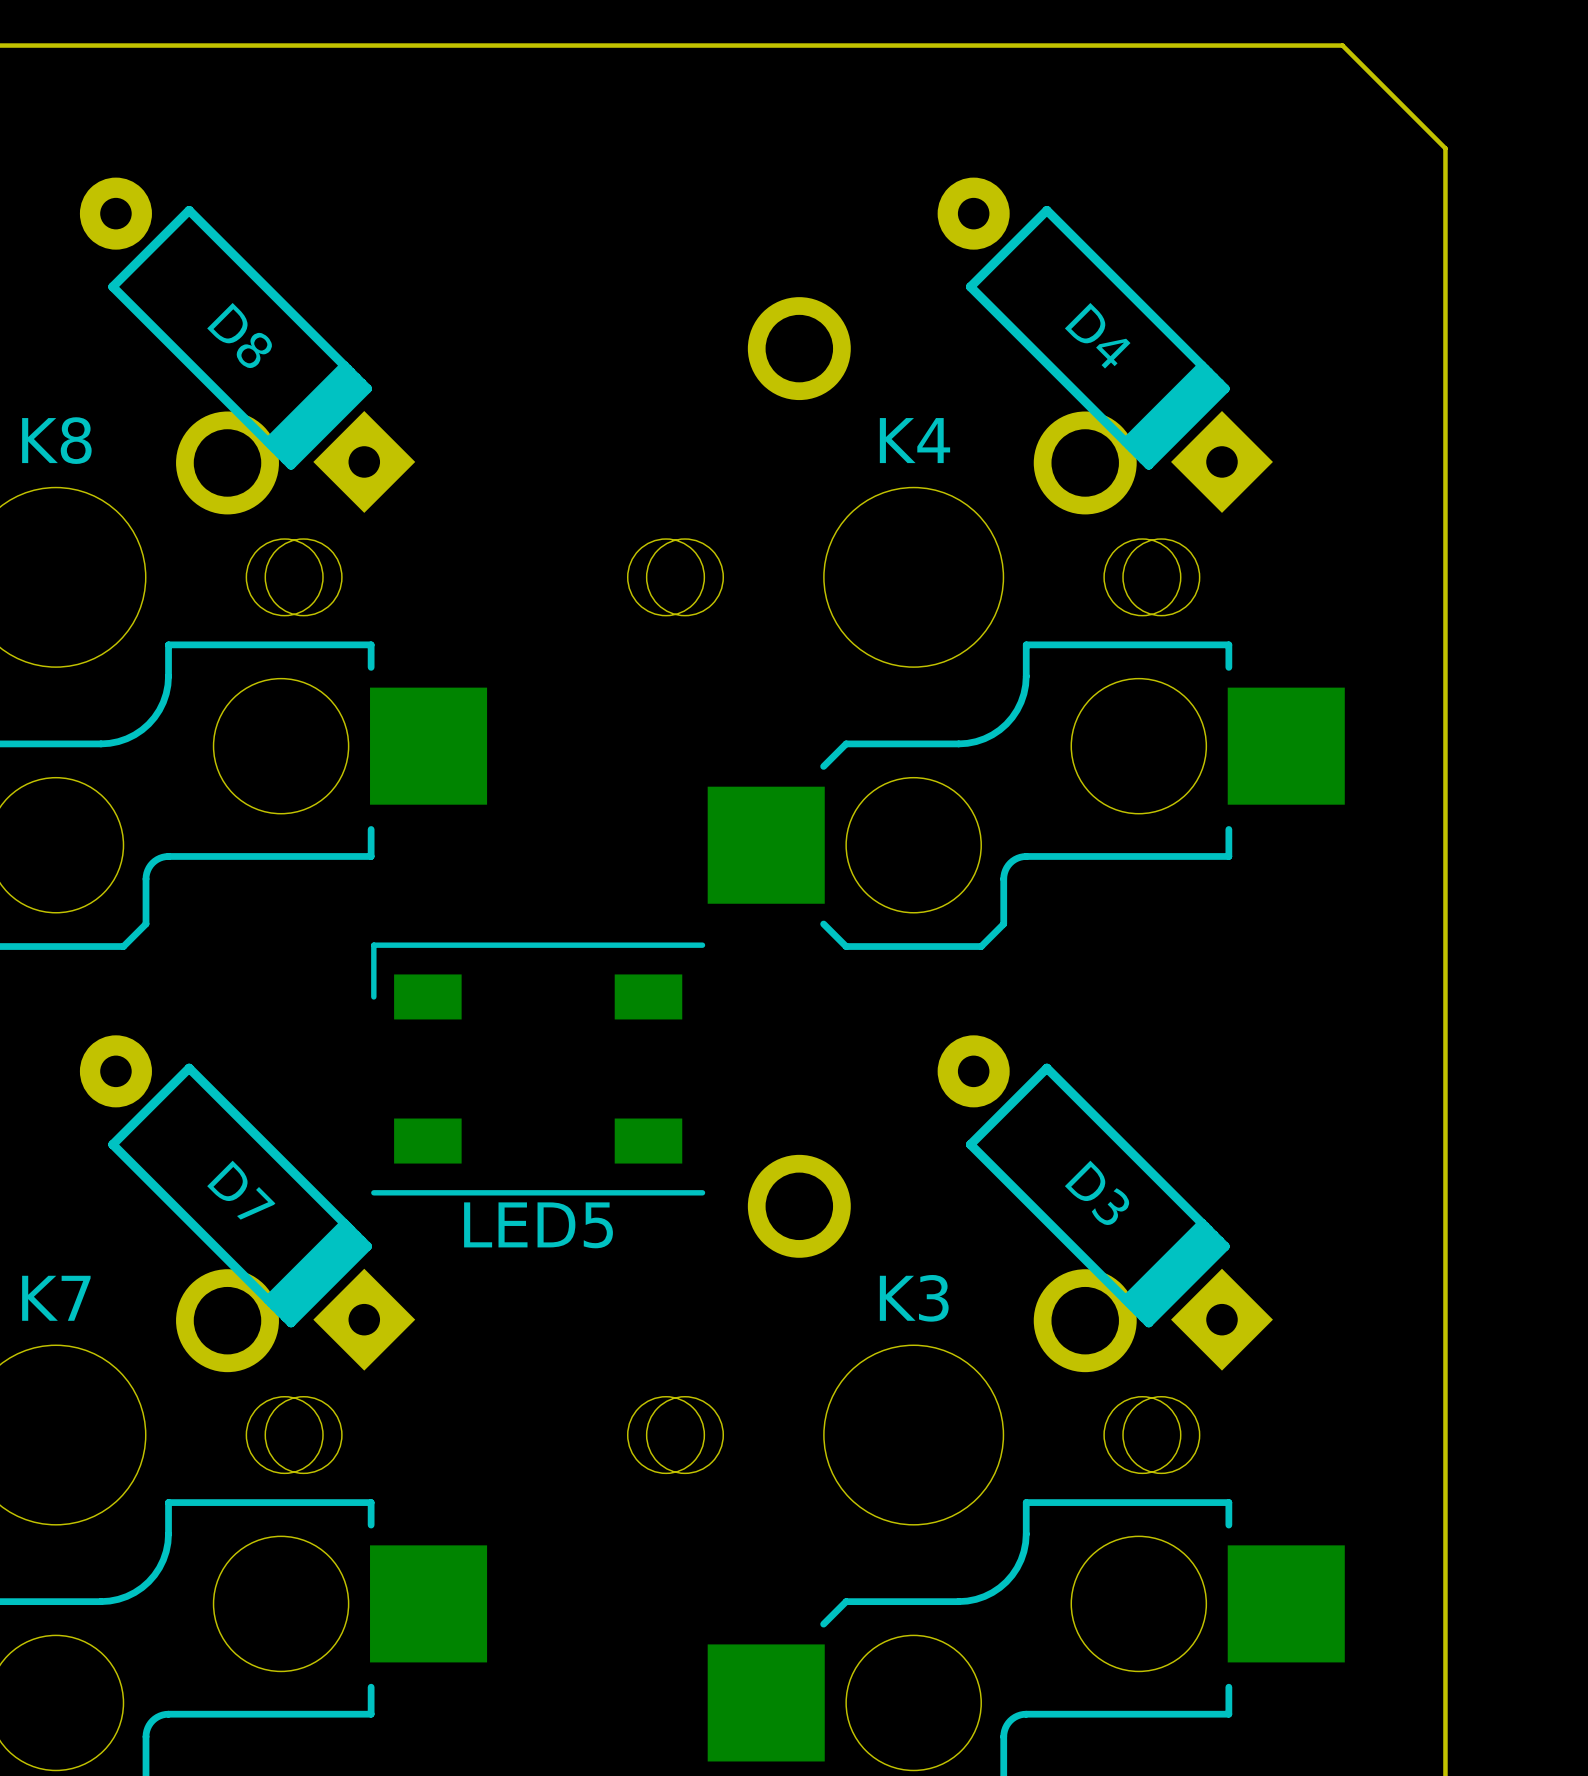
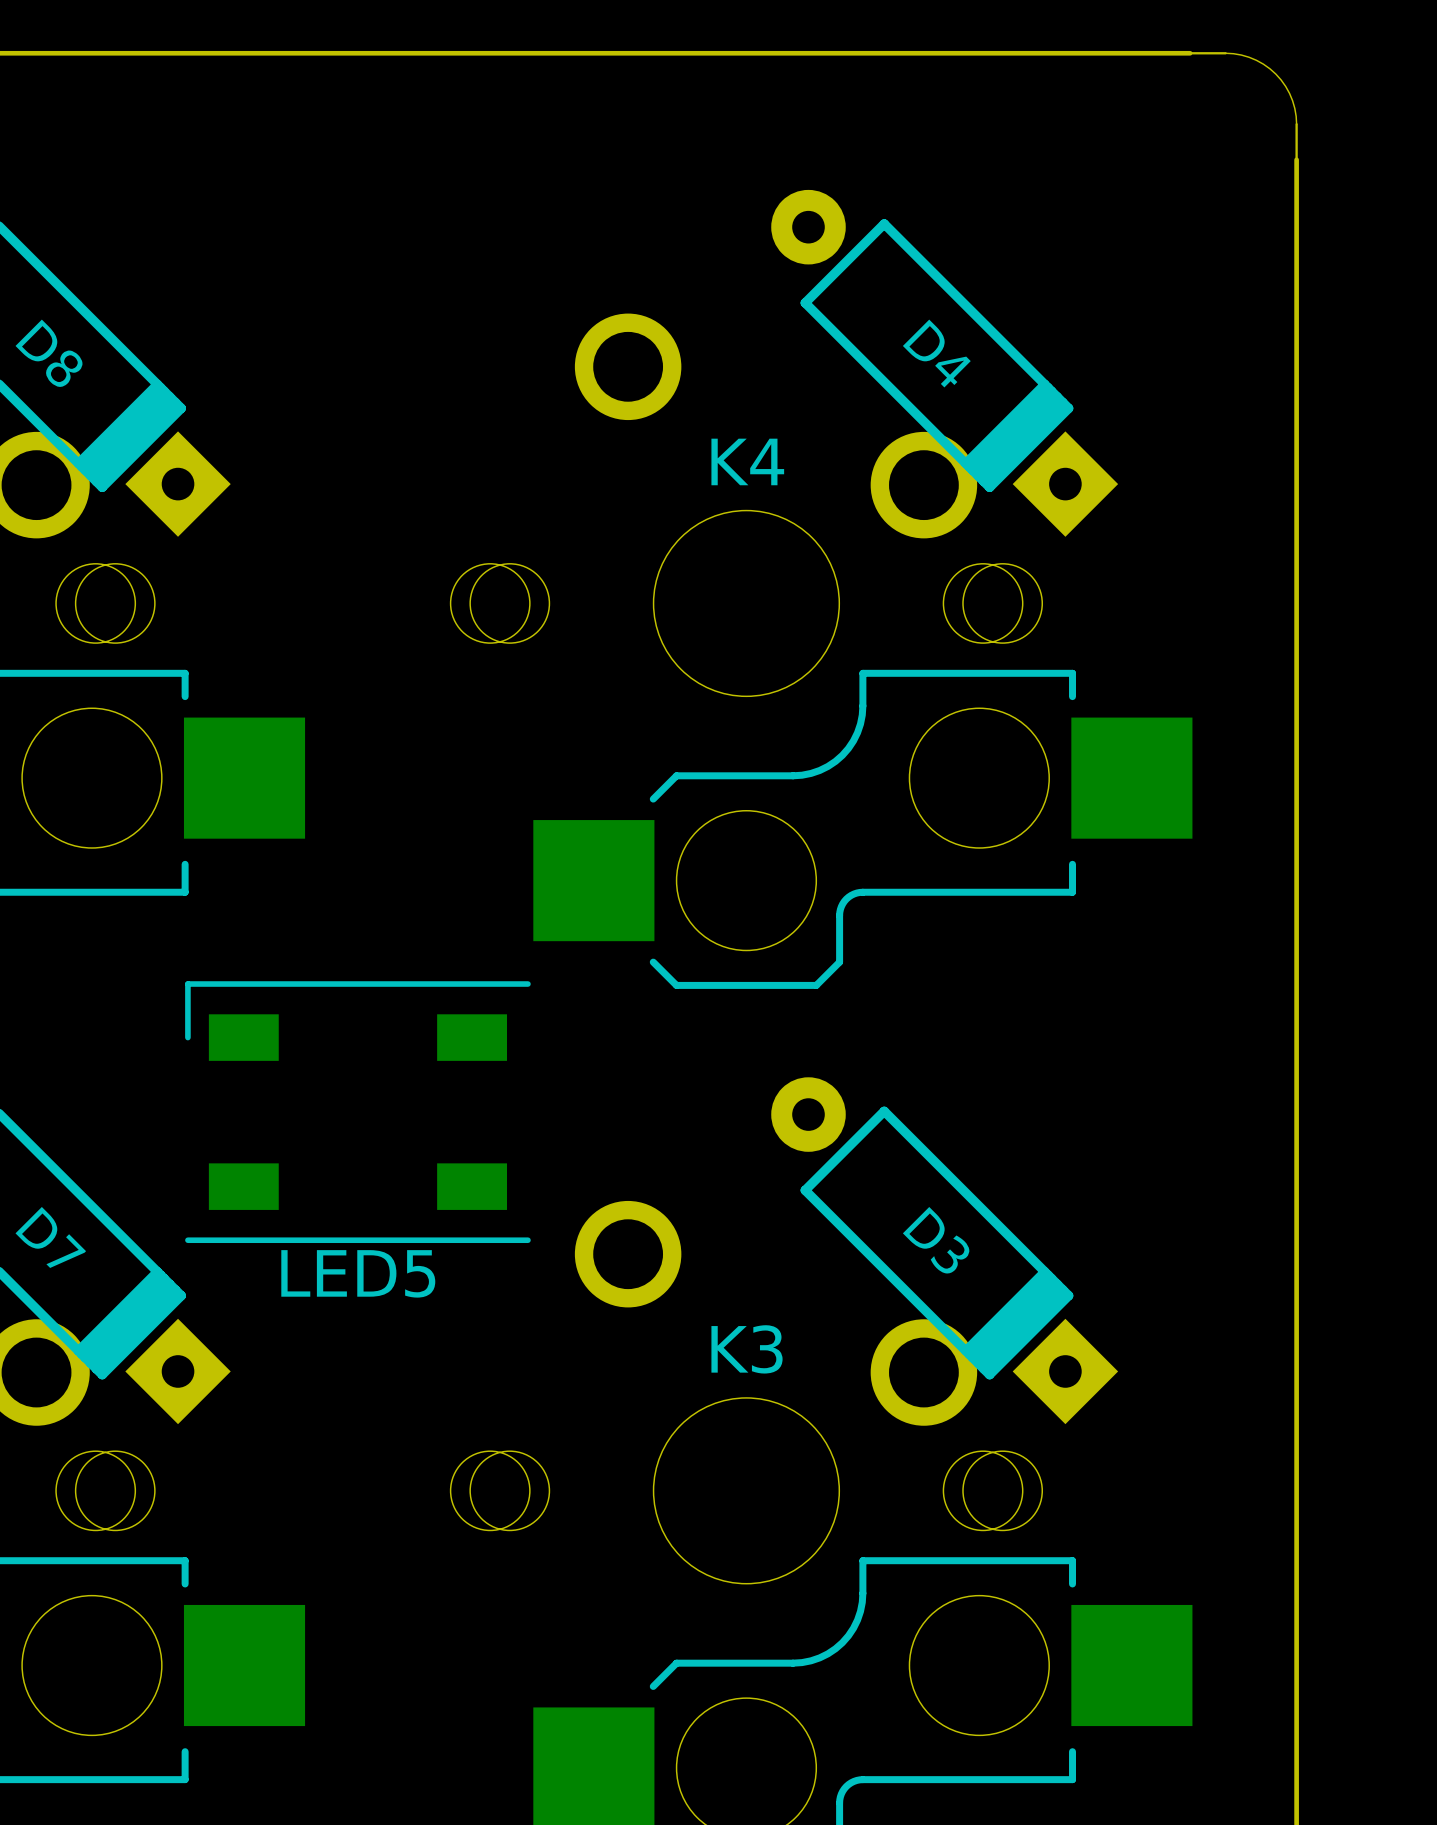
board edge: (1342, 45) (1445, 148) -> (1190, 53) (1241, 55) (1263, 64) (1275, 74) (1285, 86) (1294, 108) (1296, 159)

